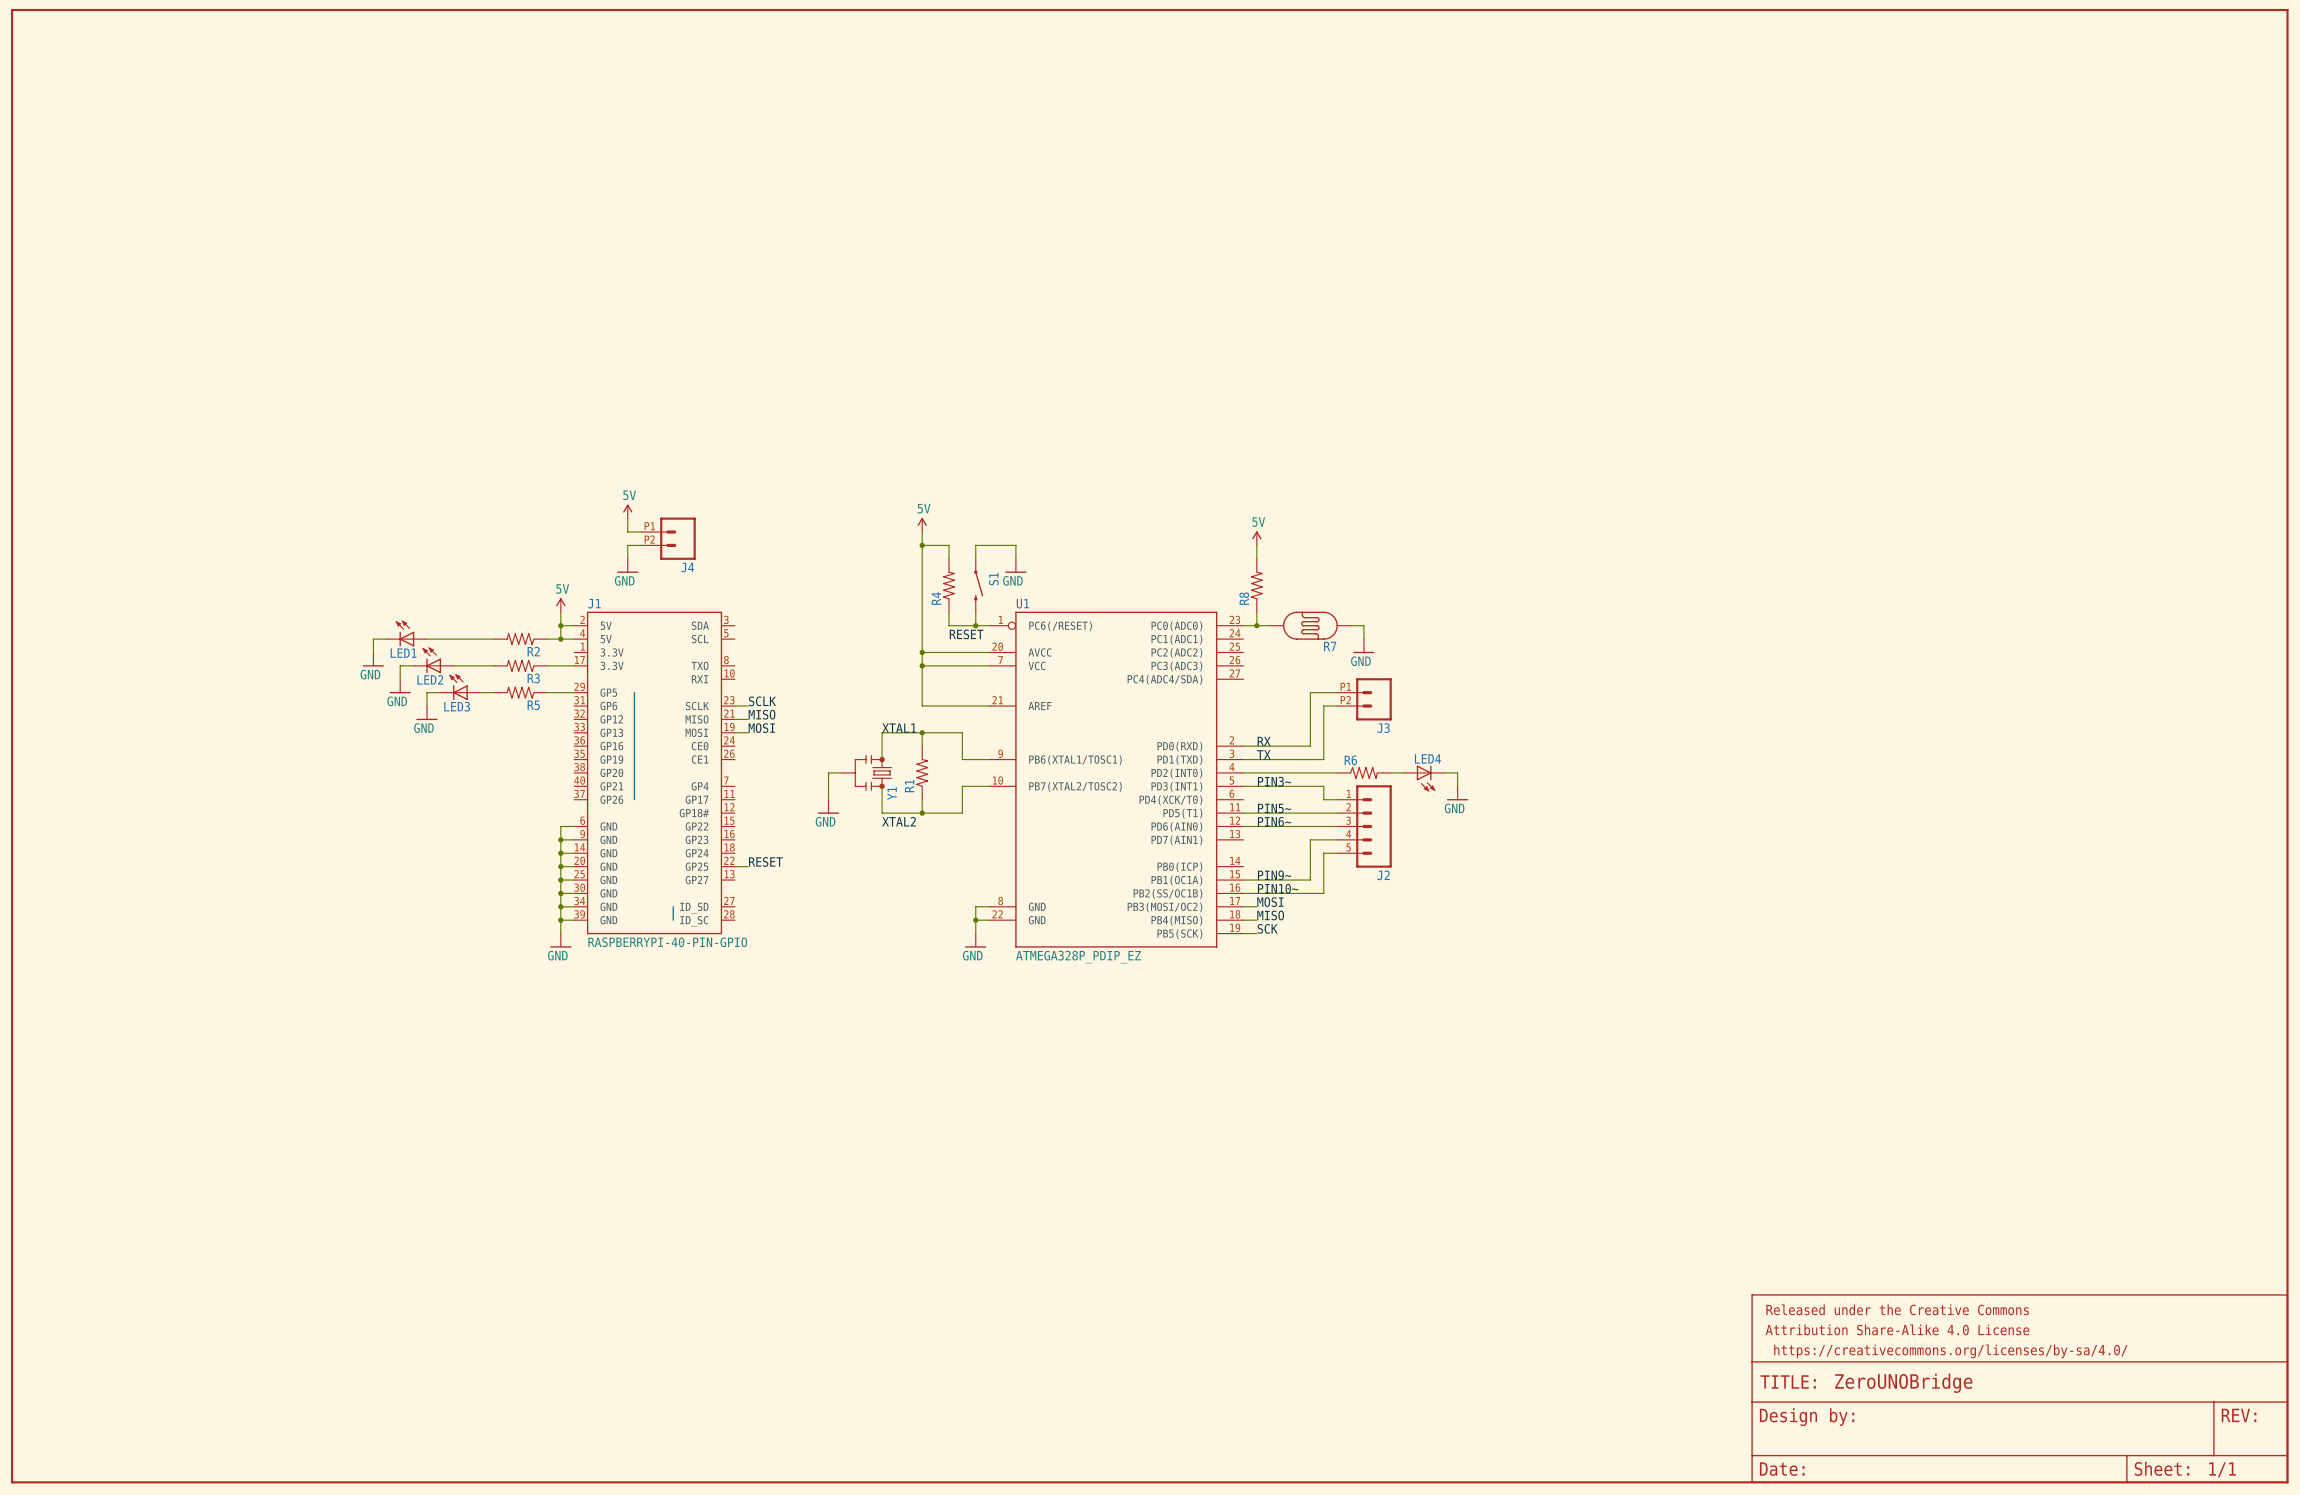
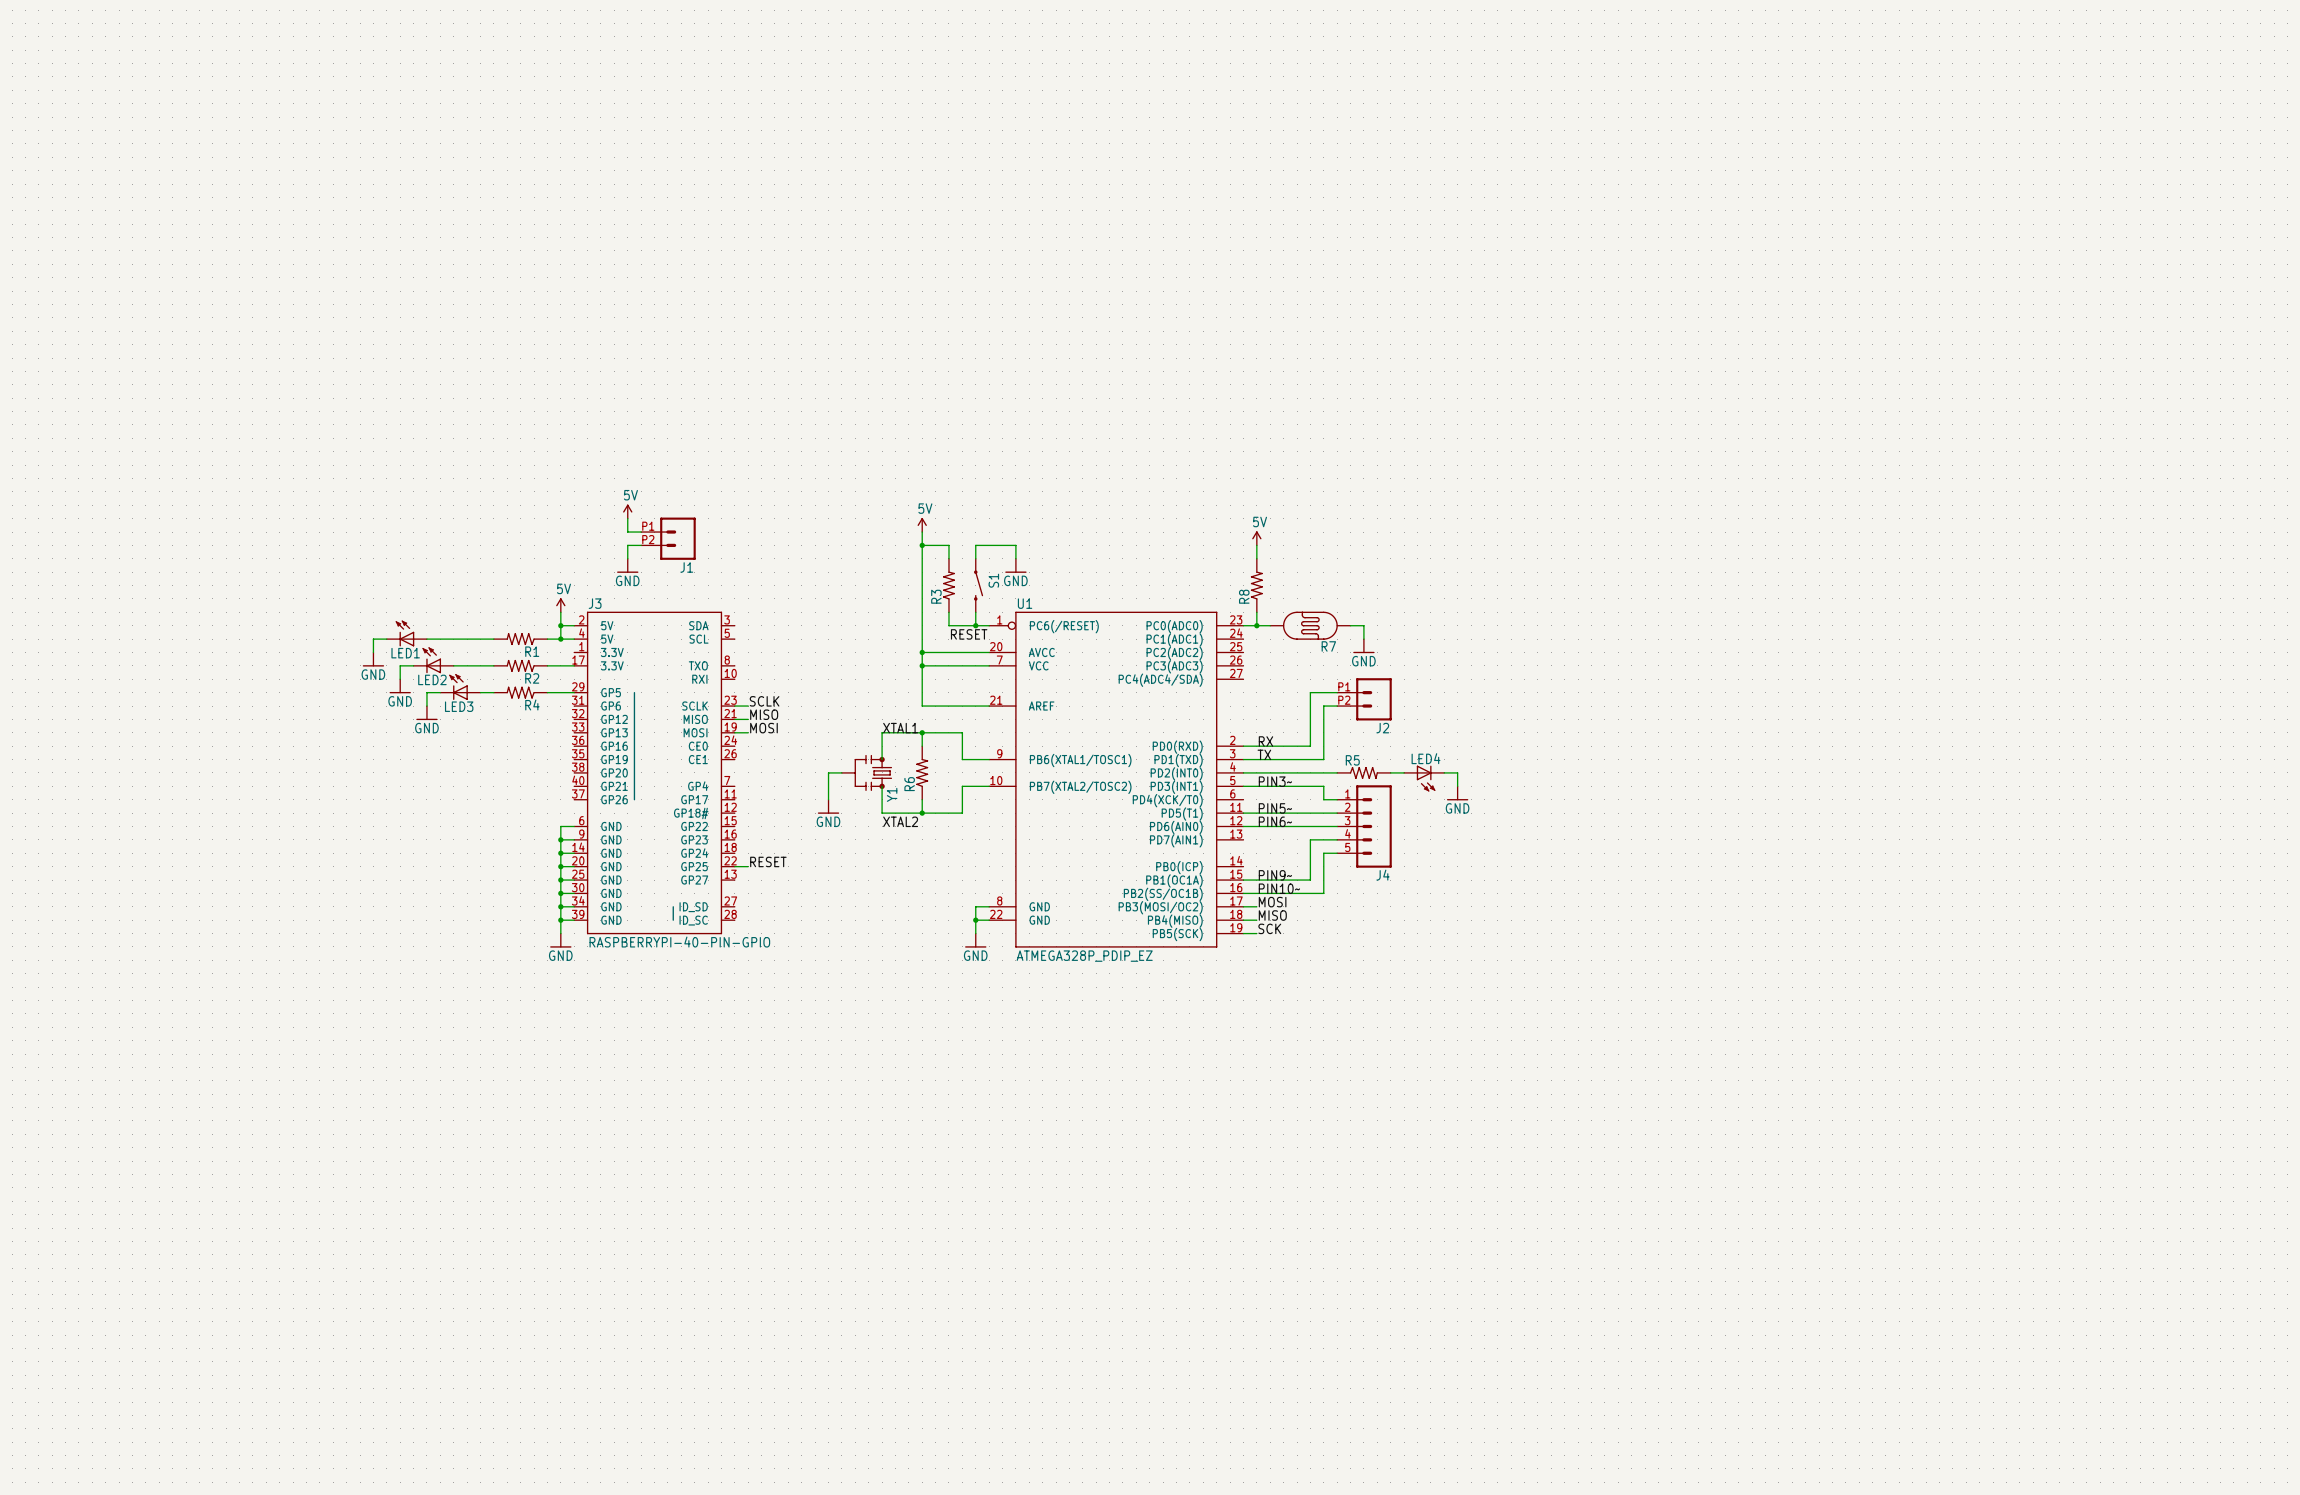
J4 name: J4 (687, 567) -> J1 (686, 567)
R4 name: R4 (936, 598) -> R3 (936, 596)
J1 name: J1 (594, 603) -> J3 (595, 603)
R2 name: R2 (533, 651) -> R1 (532, 651)
R3 name: R3 (533, 678) -> R2 (532, 678)
R5 name: R5 (533, 705) -> R4 (532, 705)
J3 name: J3 (1383, 728) -> J2 (1382, 728)
part: (1149, 746) -> none
R6 name: R6 (1350, 760) -> R5 (1352, 760)
R1 name: R1 (909, 786) -> R6 (909, 784)
J2 name: J2 (1383, 875) -> J4 (1382, 875)
part: (2019, 1388) -> none

